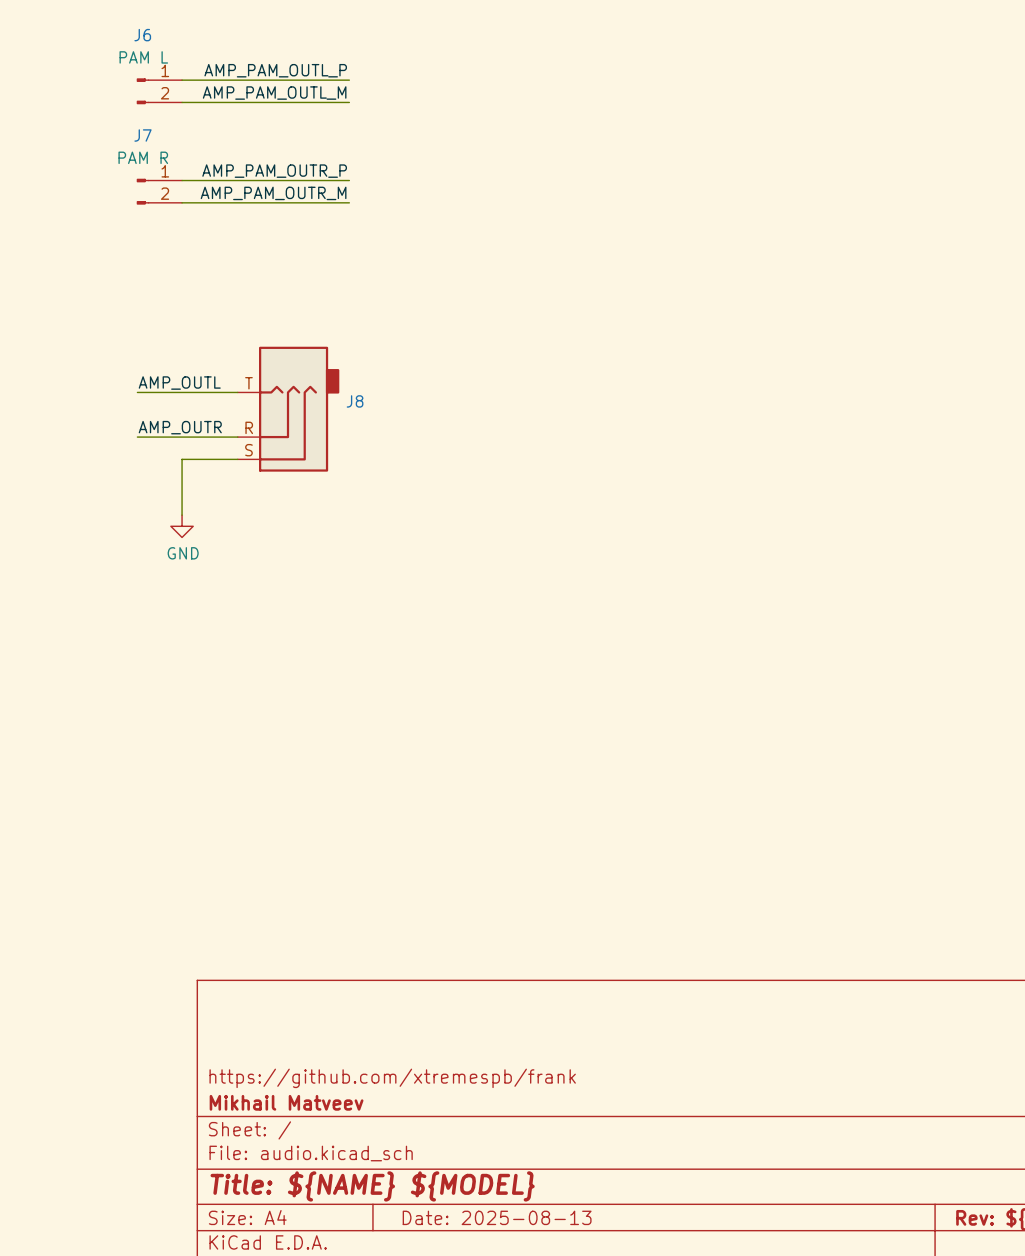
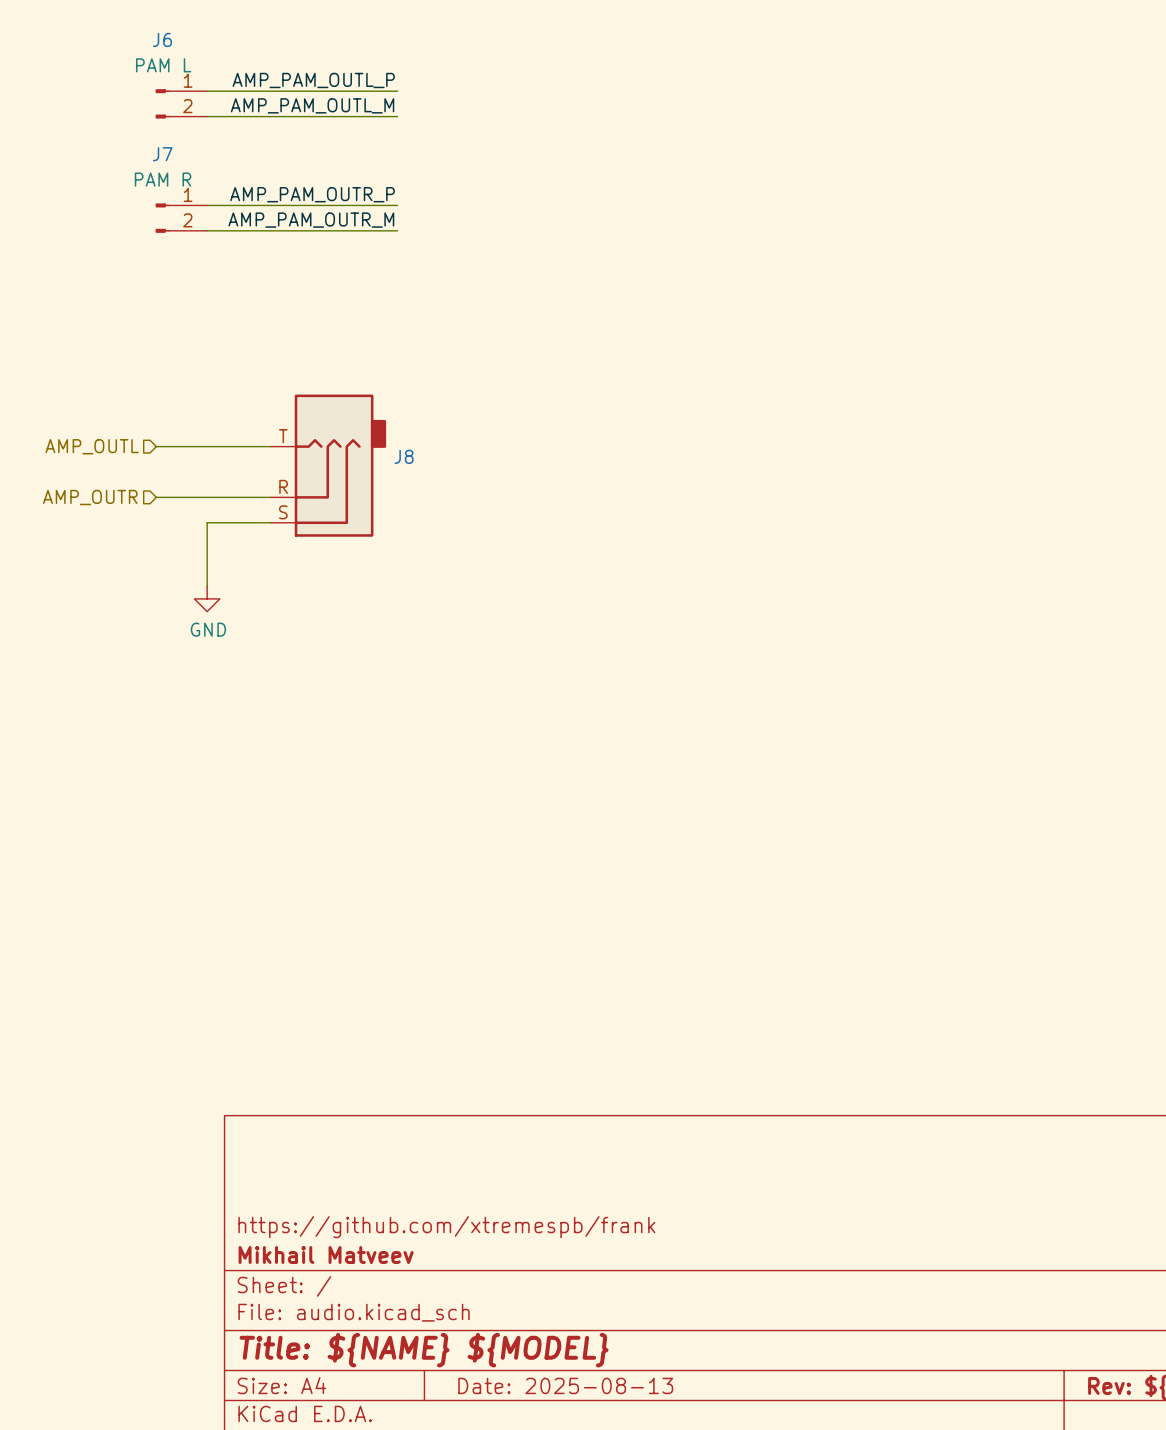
label: AMP_OUTL (179, 383) -> none
hierarchical label: none -> AMP_OUTL (92, 446)
label: AMP_OUTR (180, 427) -> none
hierarchical label: none -> AMP_OUTR (90, 497)

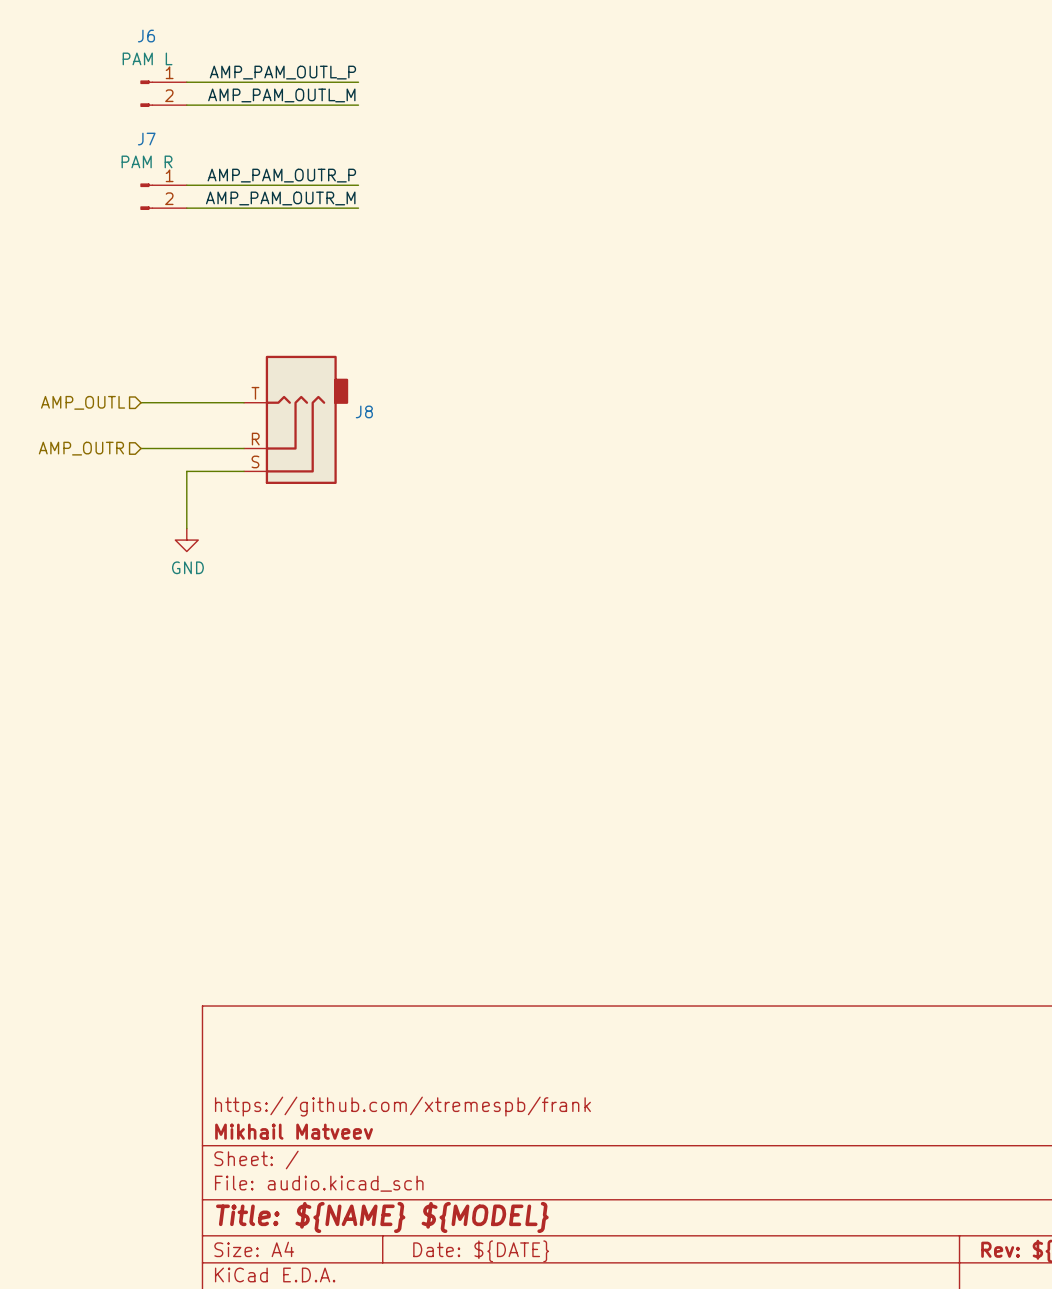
title block: Date: 2025-08-13 (565, 1385) -> Date: ${DATE} (481, 1251)

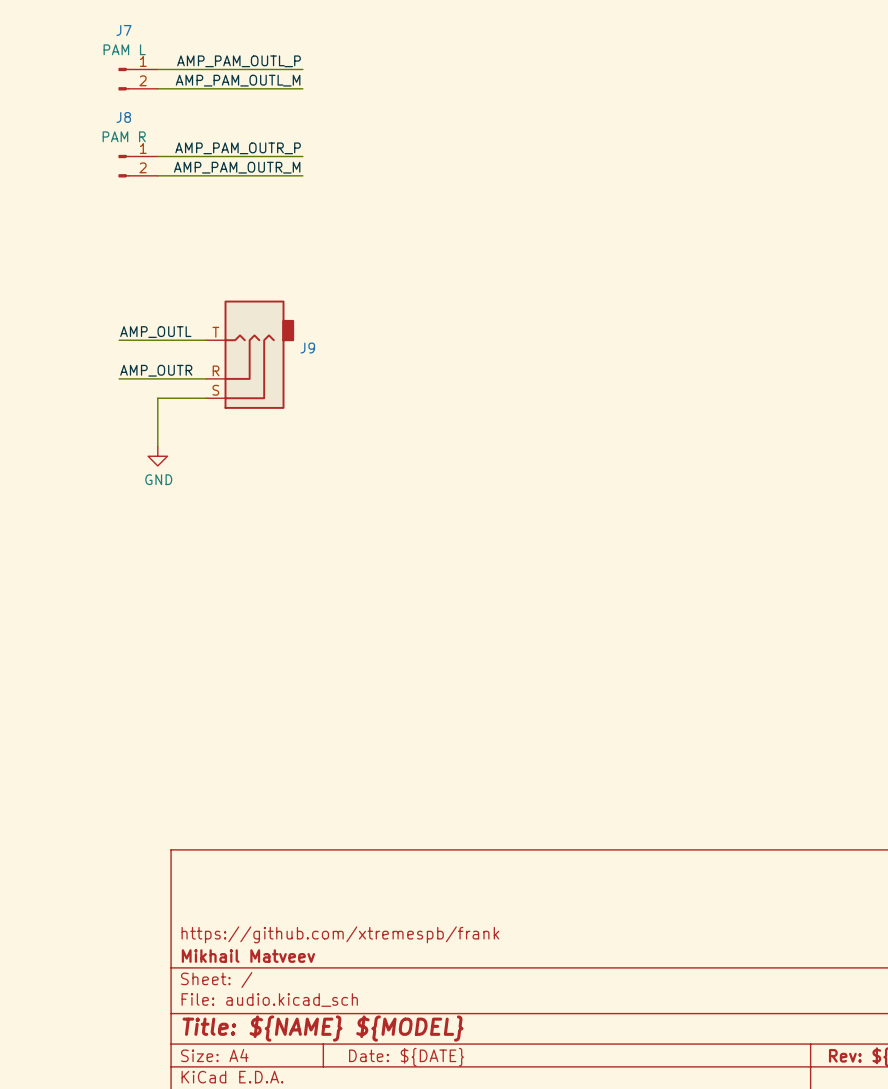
J6 name: J6 (146, 36) -> J7 (123, 30)
J7 name: J7 (146, 139) -> J8 (123, 117)
label: none -> AMP_OUTL (155, 332)
hierarchical label: AMP_OUTL (83, 402) -> none
J8 name: J8 (364, 411) -> J9 (307, 348)
label: none -> AMP_OUTR (156, 370)
hierarchical label: AMP_OUTR (81, 448) -> none

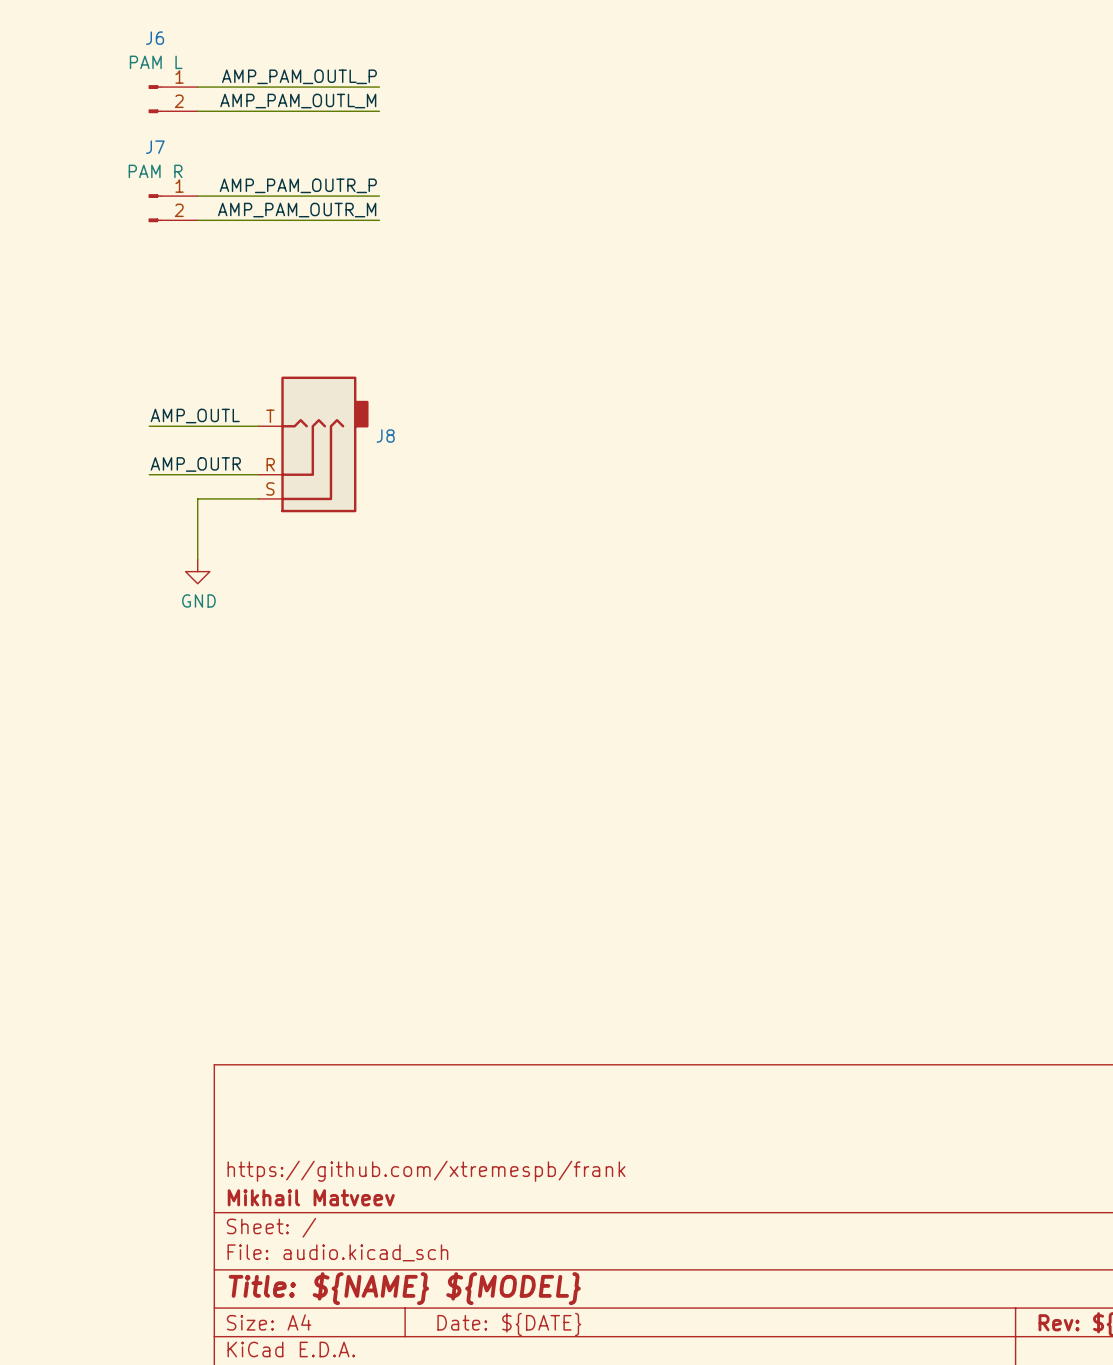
J7 name: J7 (123, 30) -> J6 (155, 38)
J8 name: J8 (123, 117) -> J7 (155, 147)
J9 name: J9 (307, 348) -> J8 (385, 436)

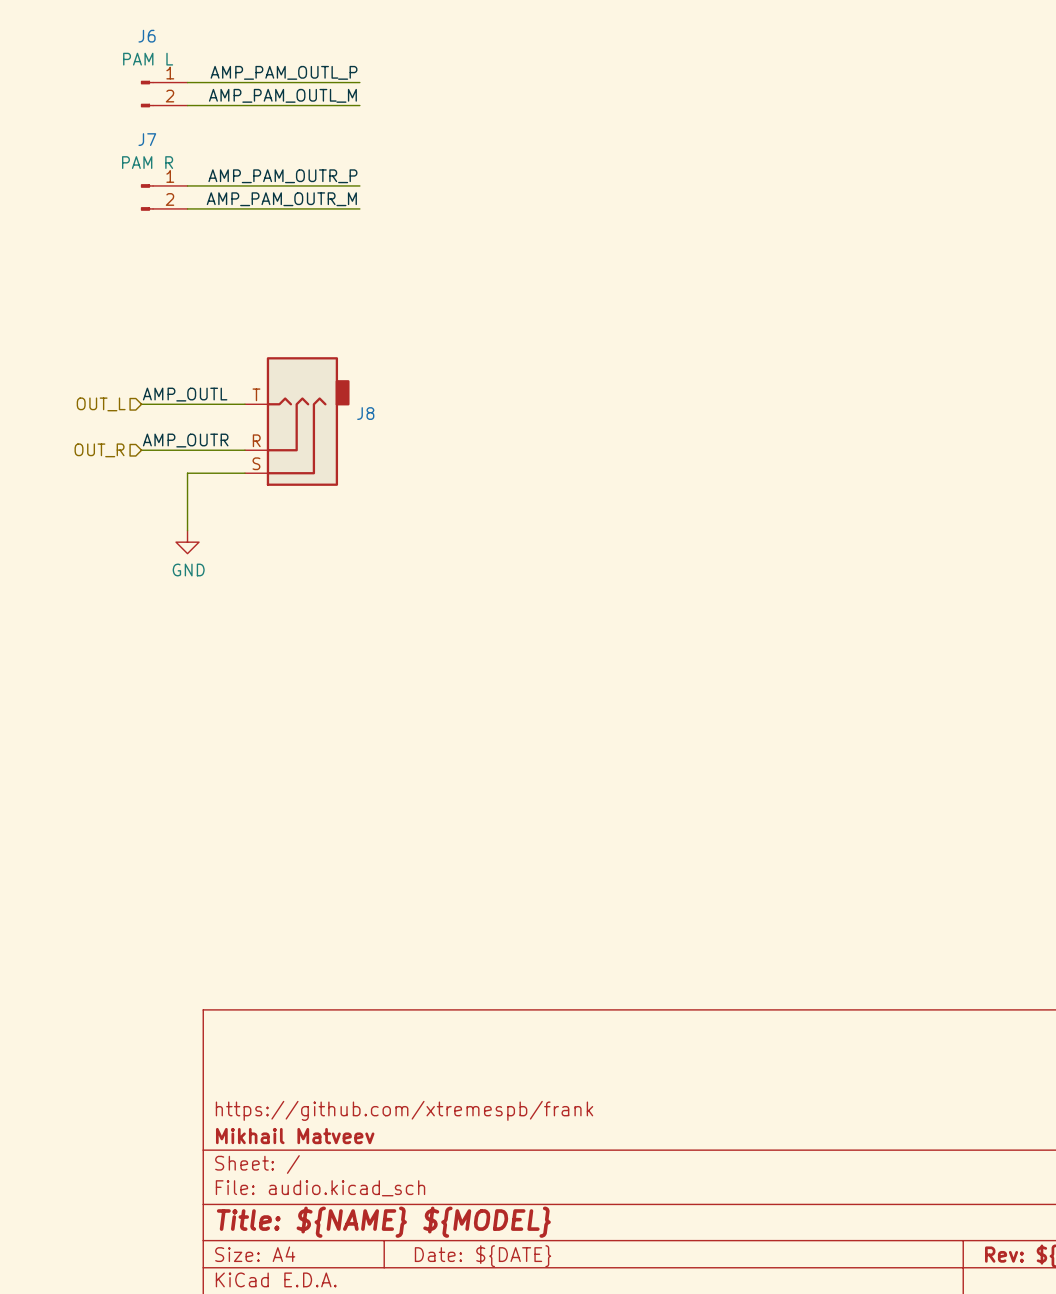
hierarchical label: none -> OUT_L (101, 404)
hierarchical label: none -> OUT_R (99, 450)

